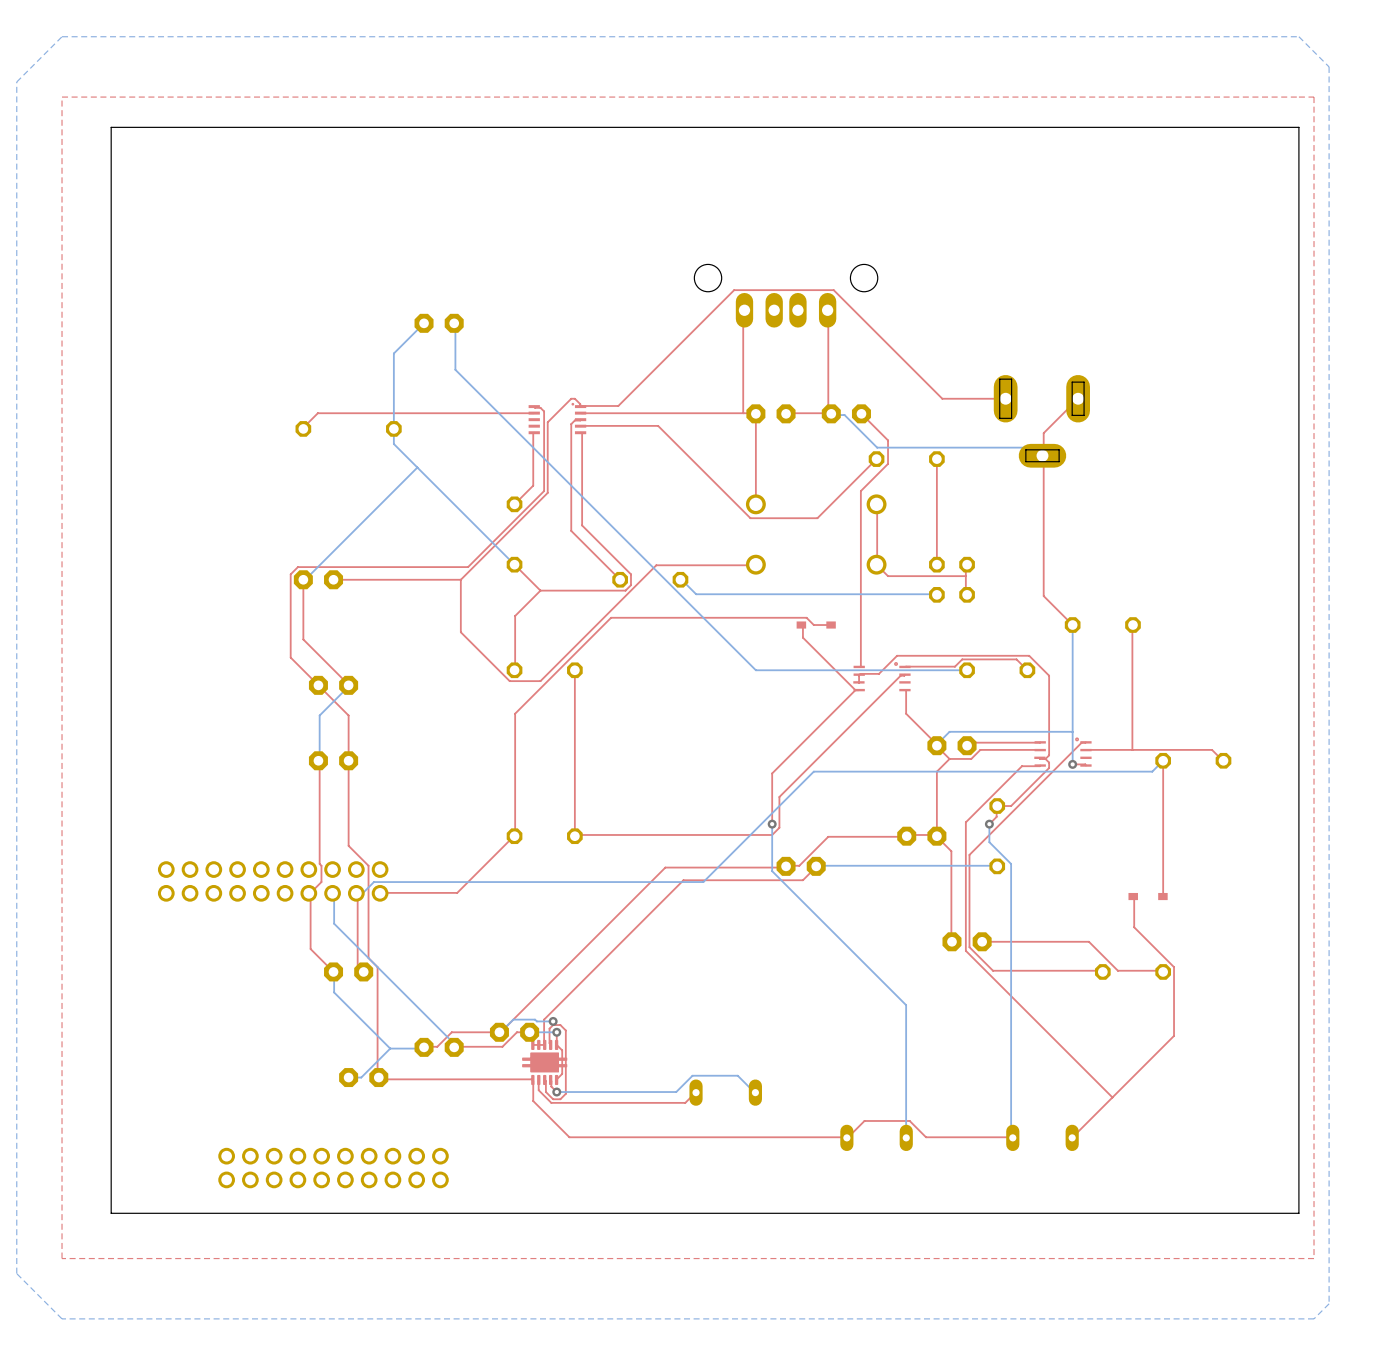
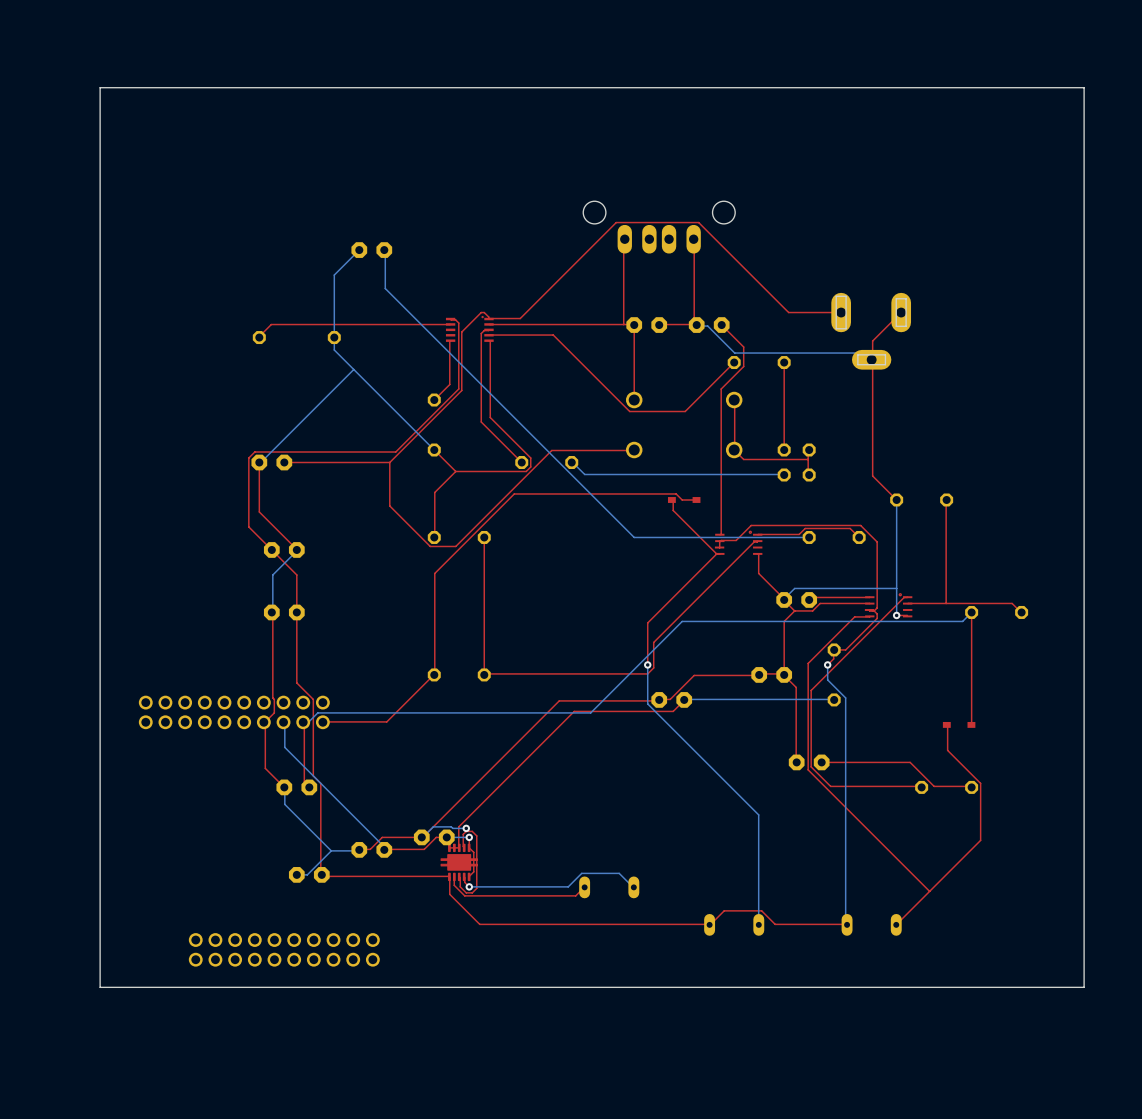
bottom zone outline: (1298, 36) (62, 36) (16, 81) (16, 1273) (62, 1318) (1314, 1318) (1329, 1303) (1329, 66) (1298, 36) -> none
top zone outline: (1314, 97) (1314, 1258) (62, 1258) (62, 97) (1314, 97) -> none

